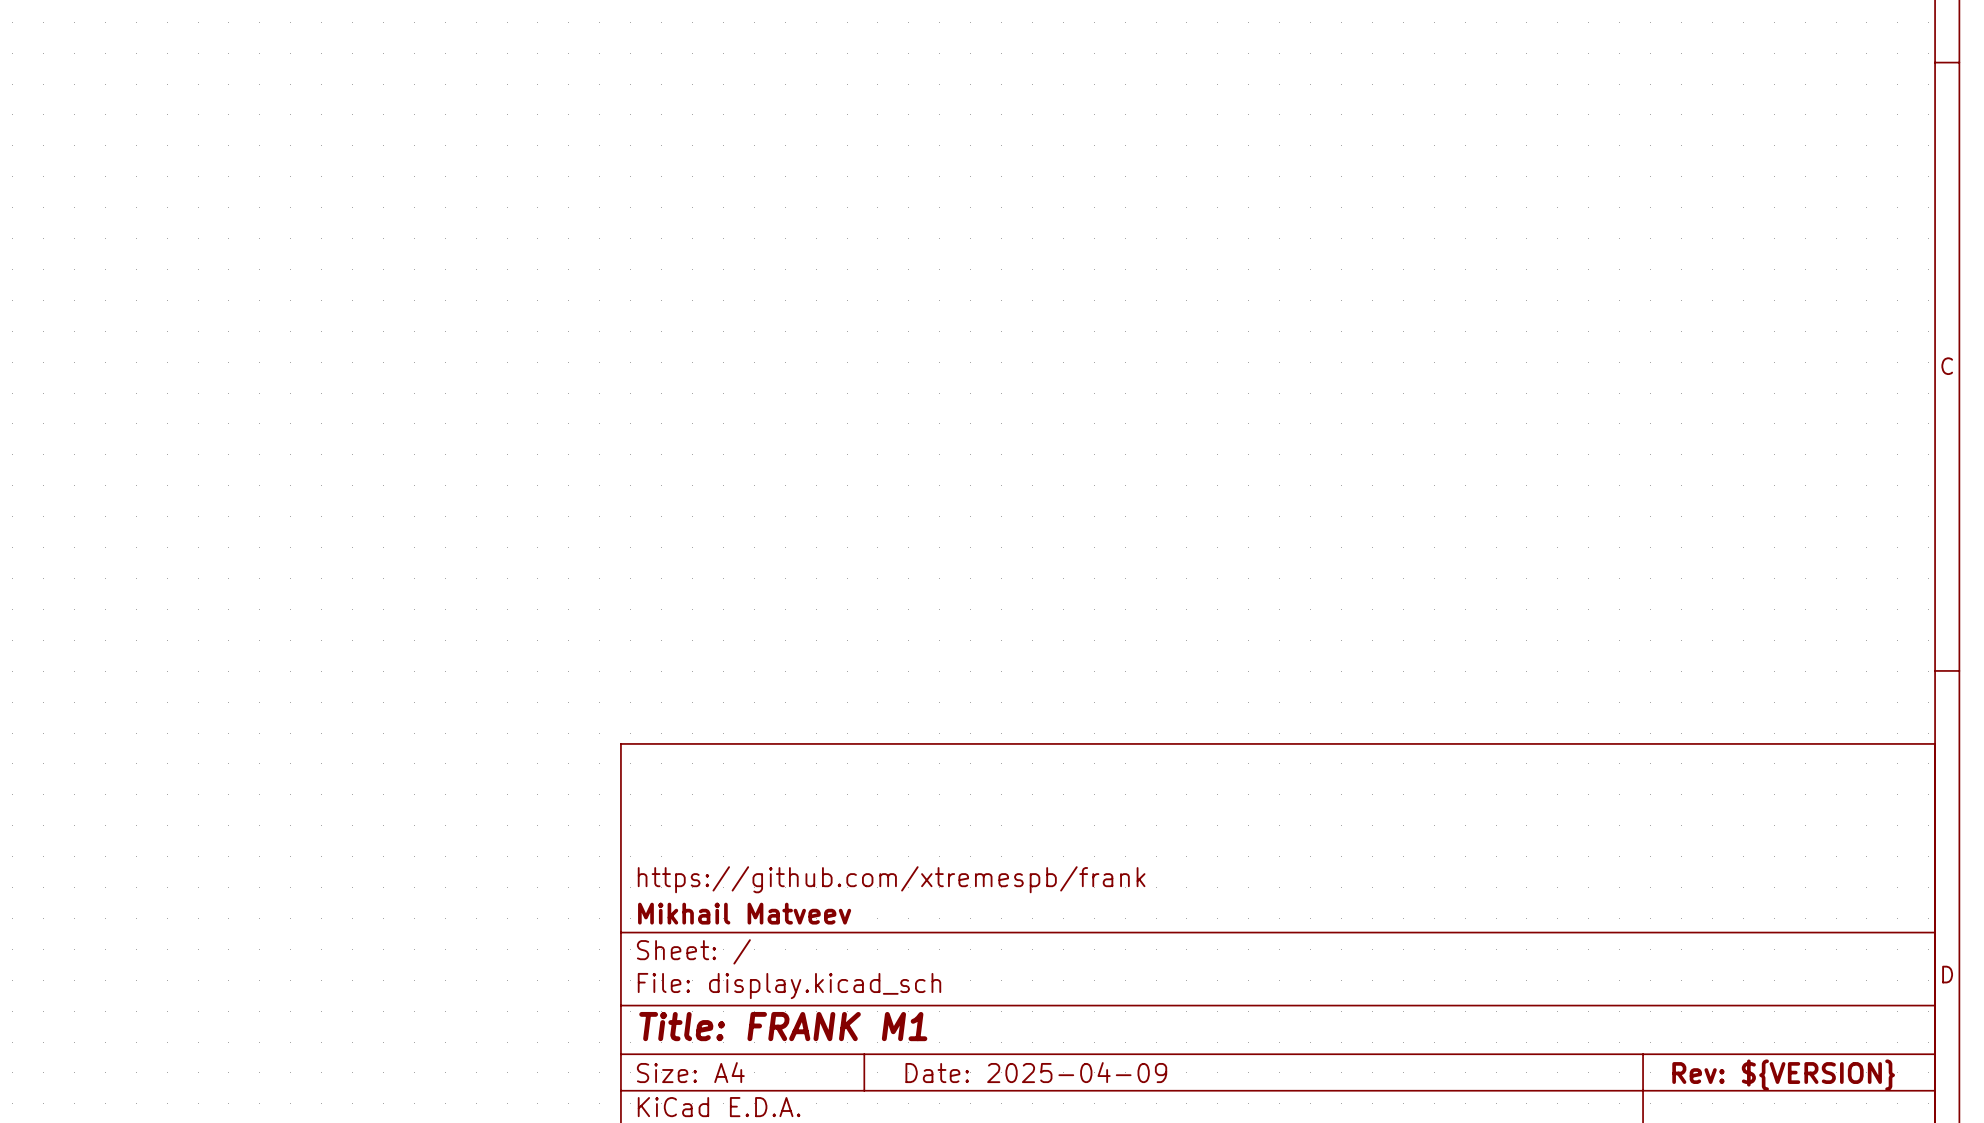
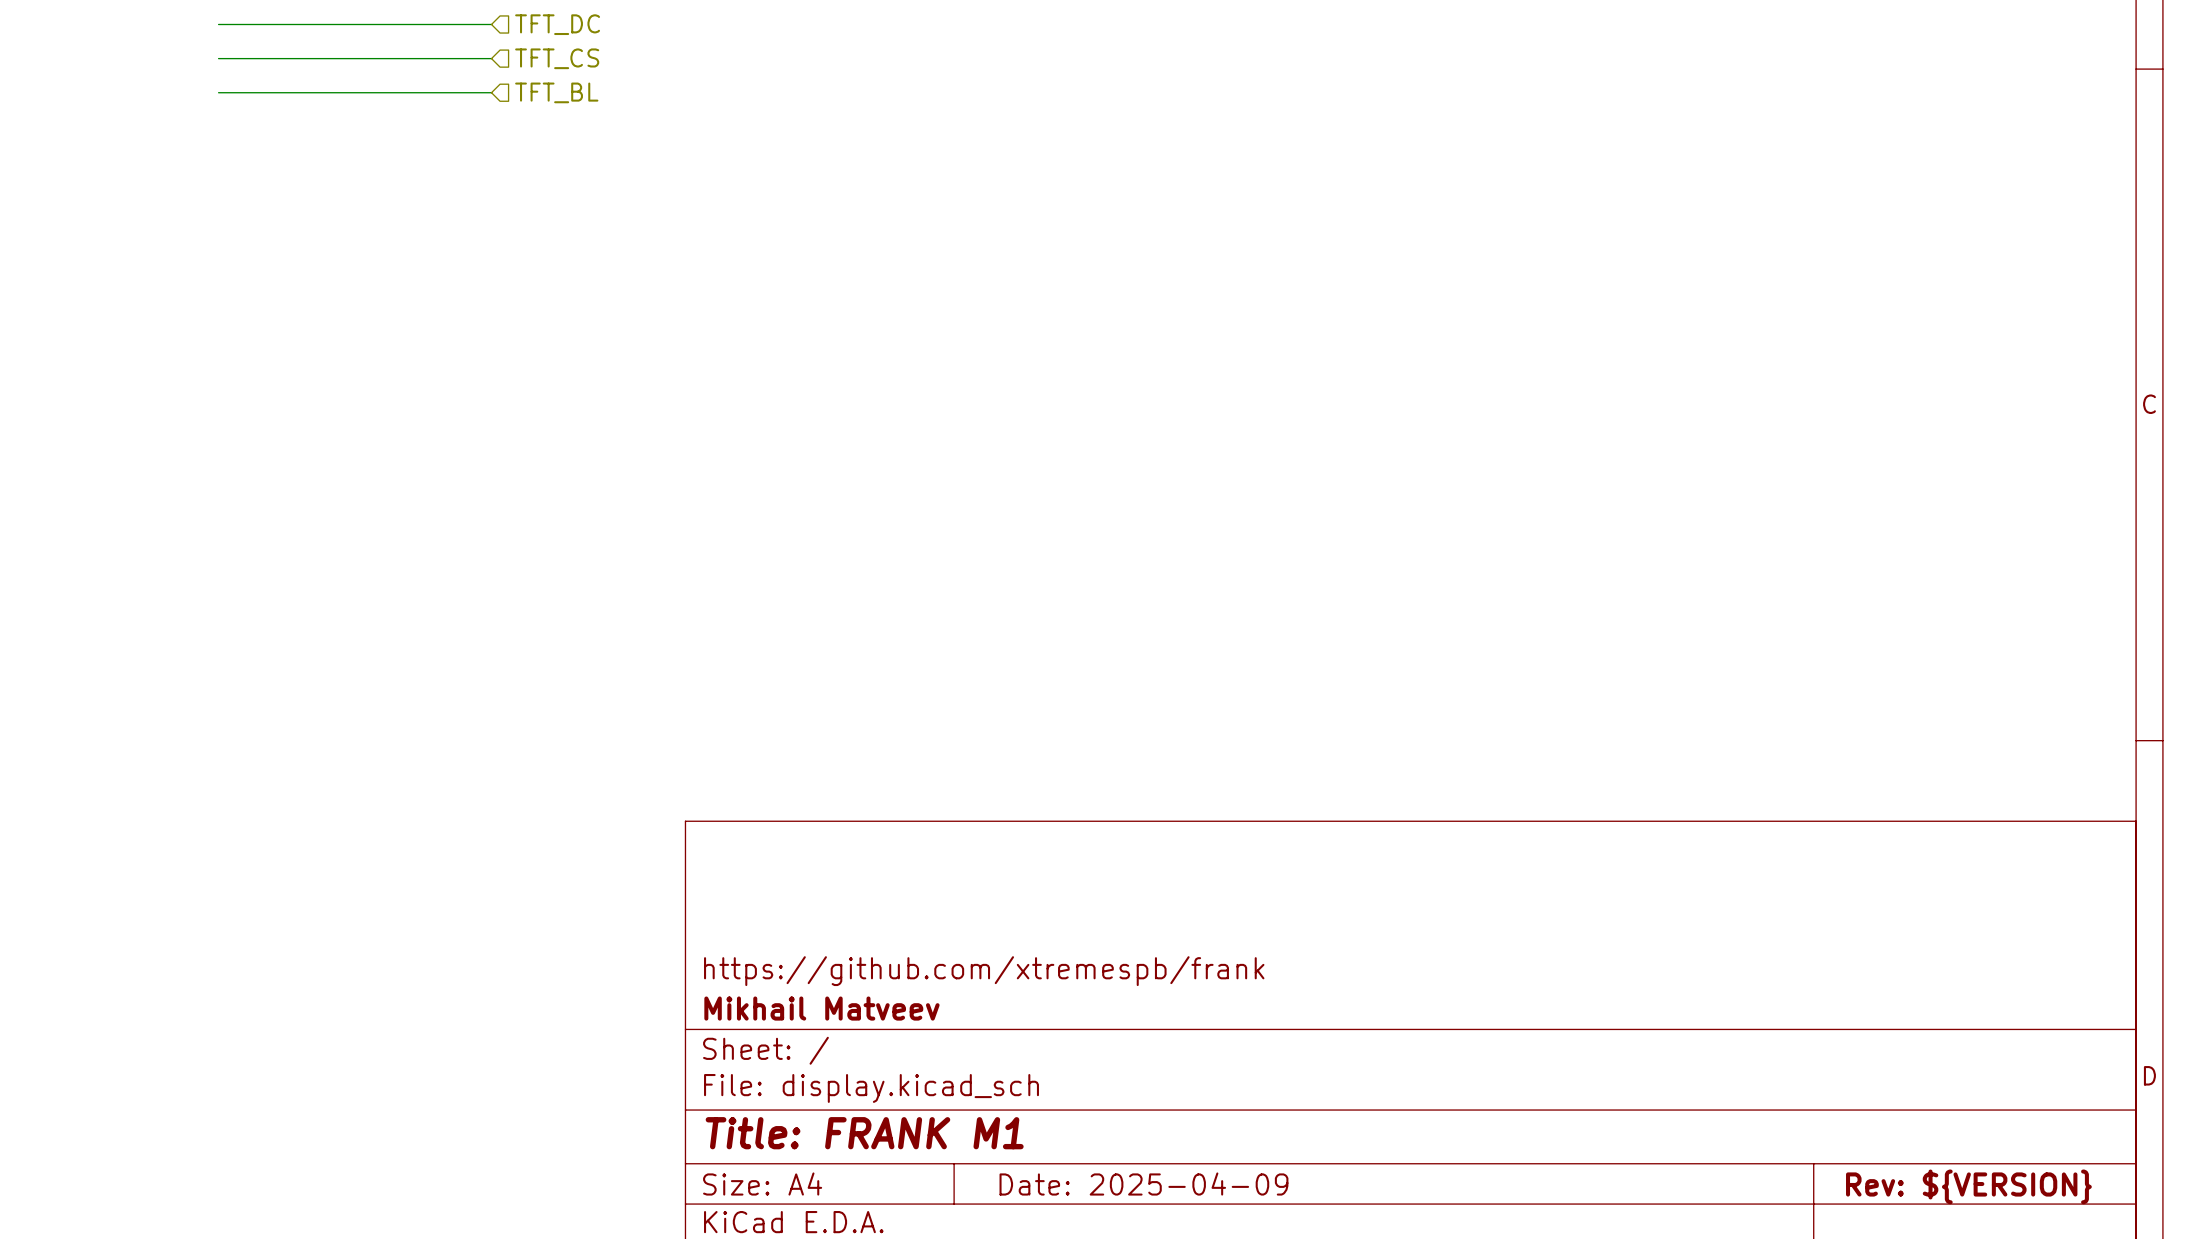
wire: none -> (218, 24) (491, 24)
hierarchical label: none -> TFT_DC (557, 24)
wire: none -> (218, 58) (491, 58)
hierarchical label: none -> TFT_CS (557, 58)
wire: none -> (218, 92) (491, 92)
hierarchical label: none -> TFT_BL (556, 92)

